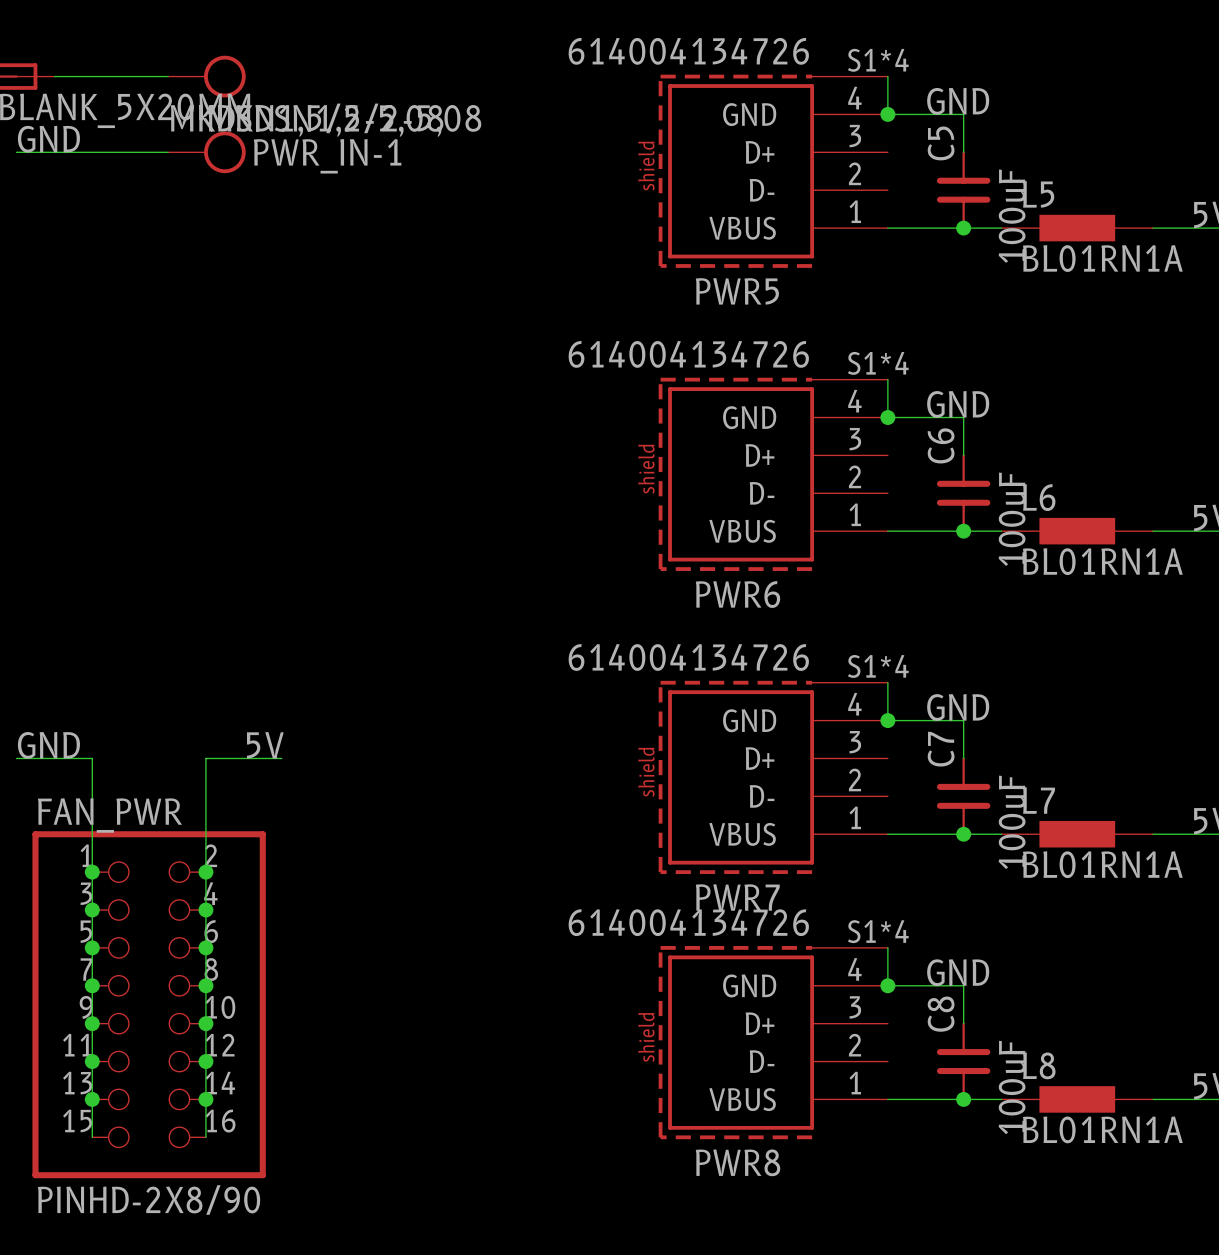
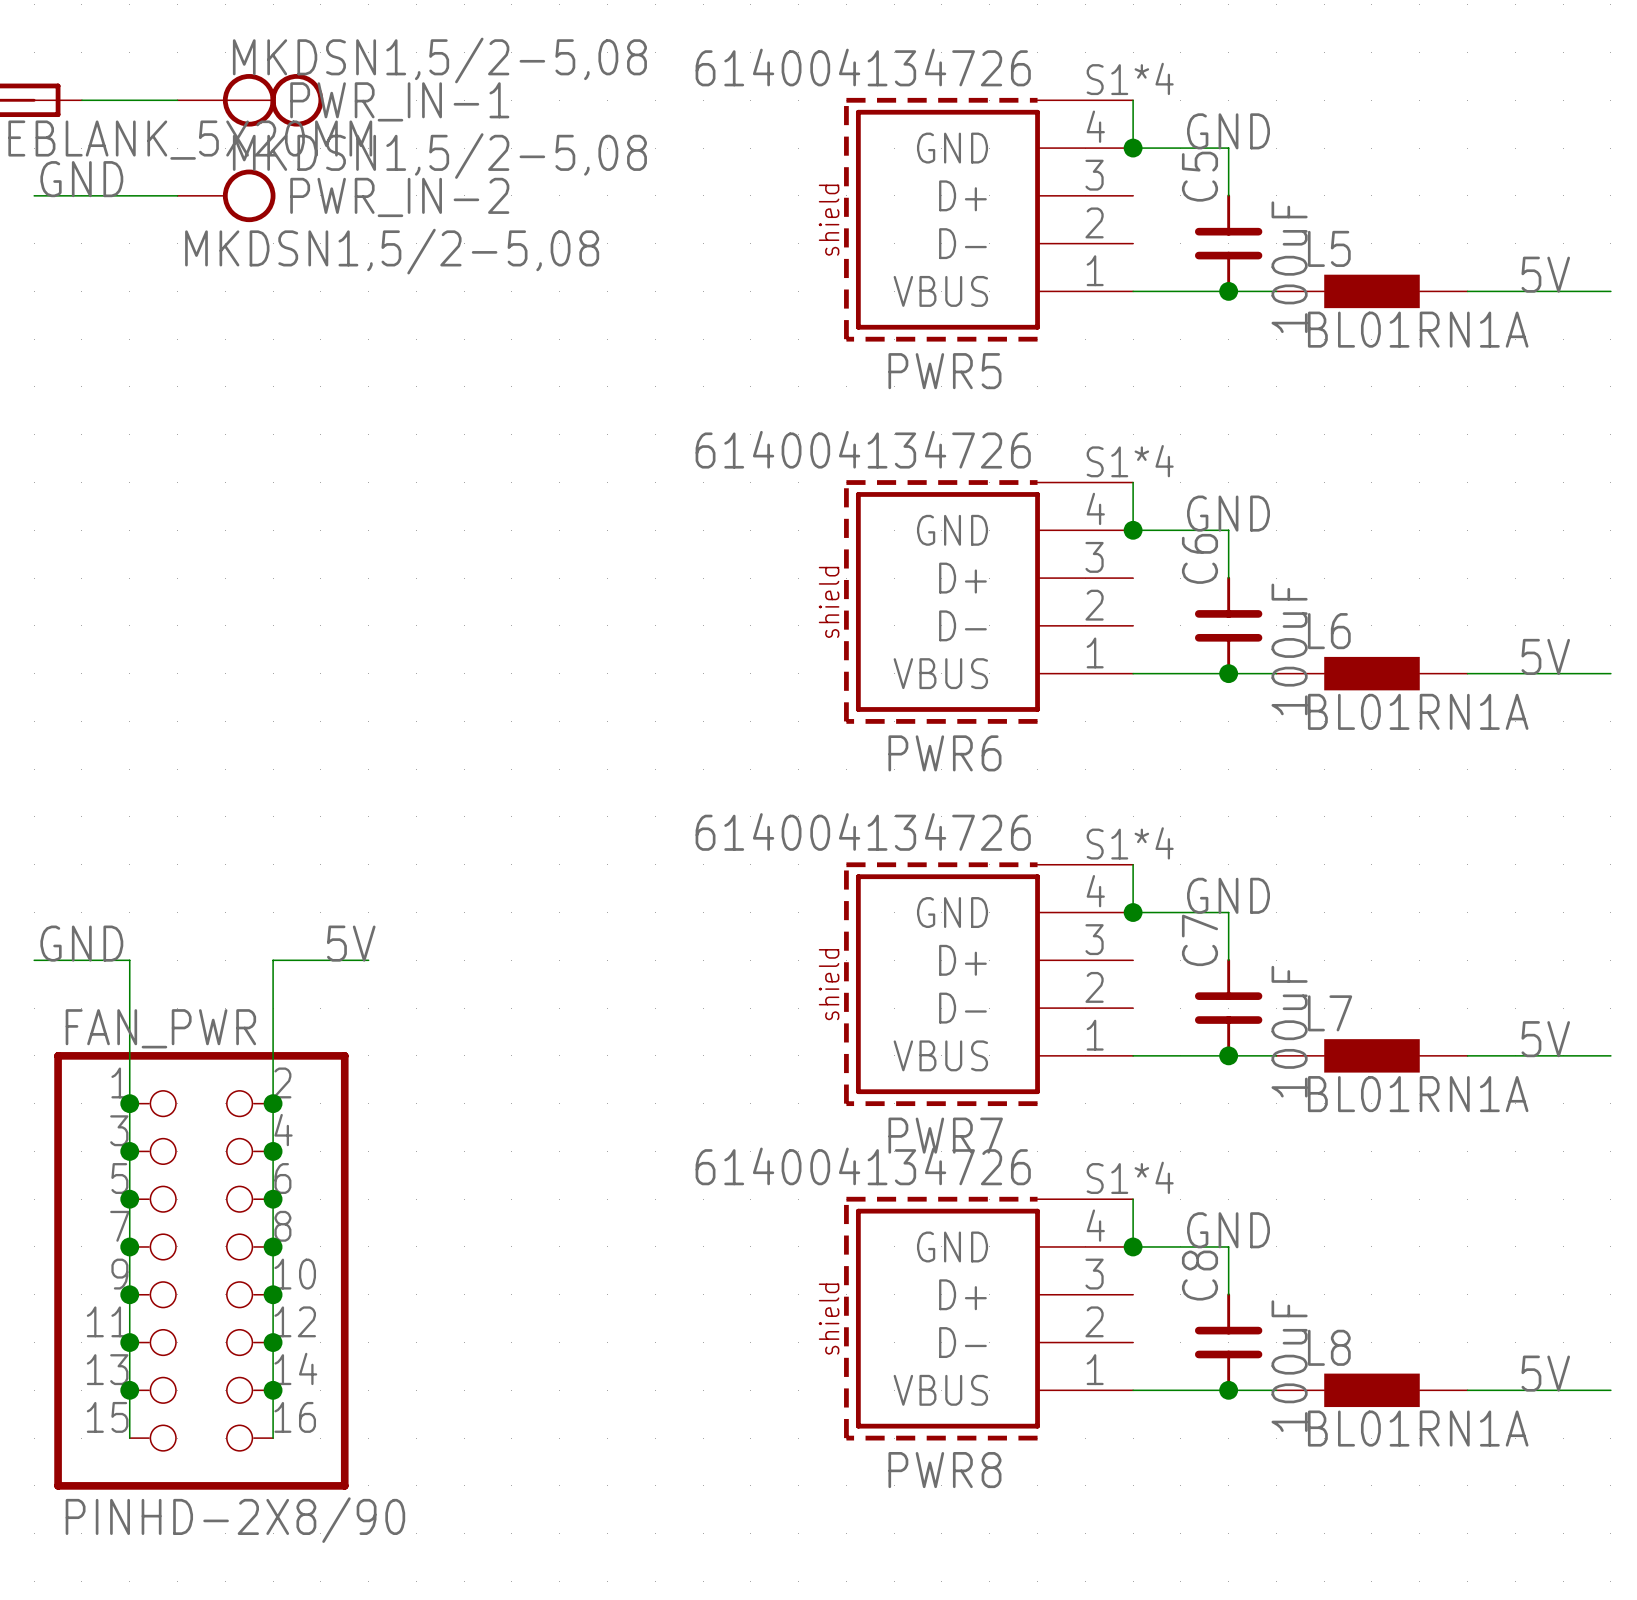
PWR_IN-2: none -> MKDSN1,5/2-5,08 (226, 195)
PWR_IN-1 position: (206, 152) -> (226, 100)

